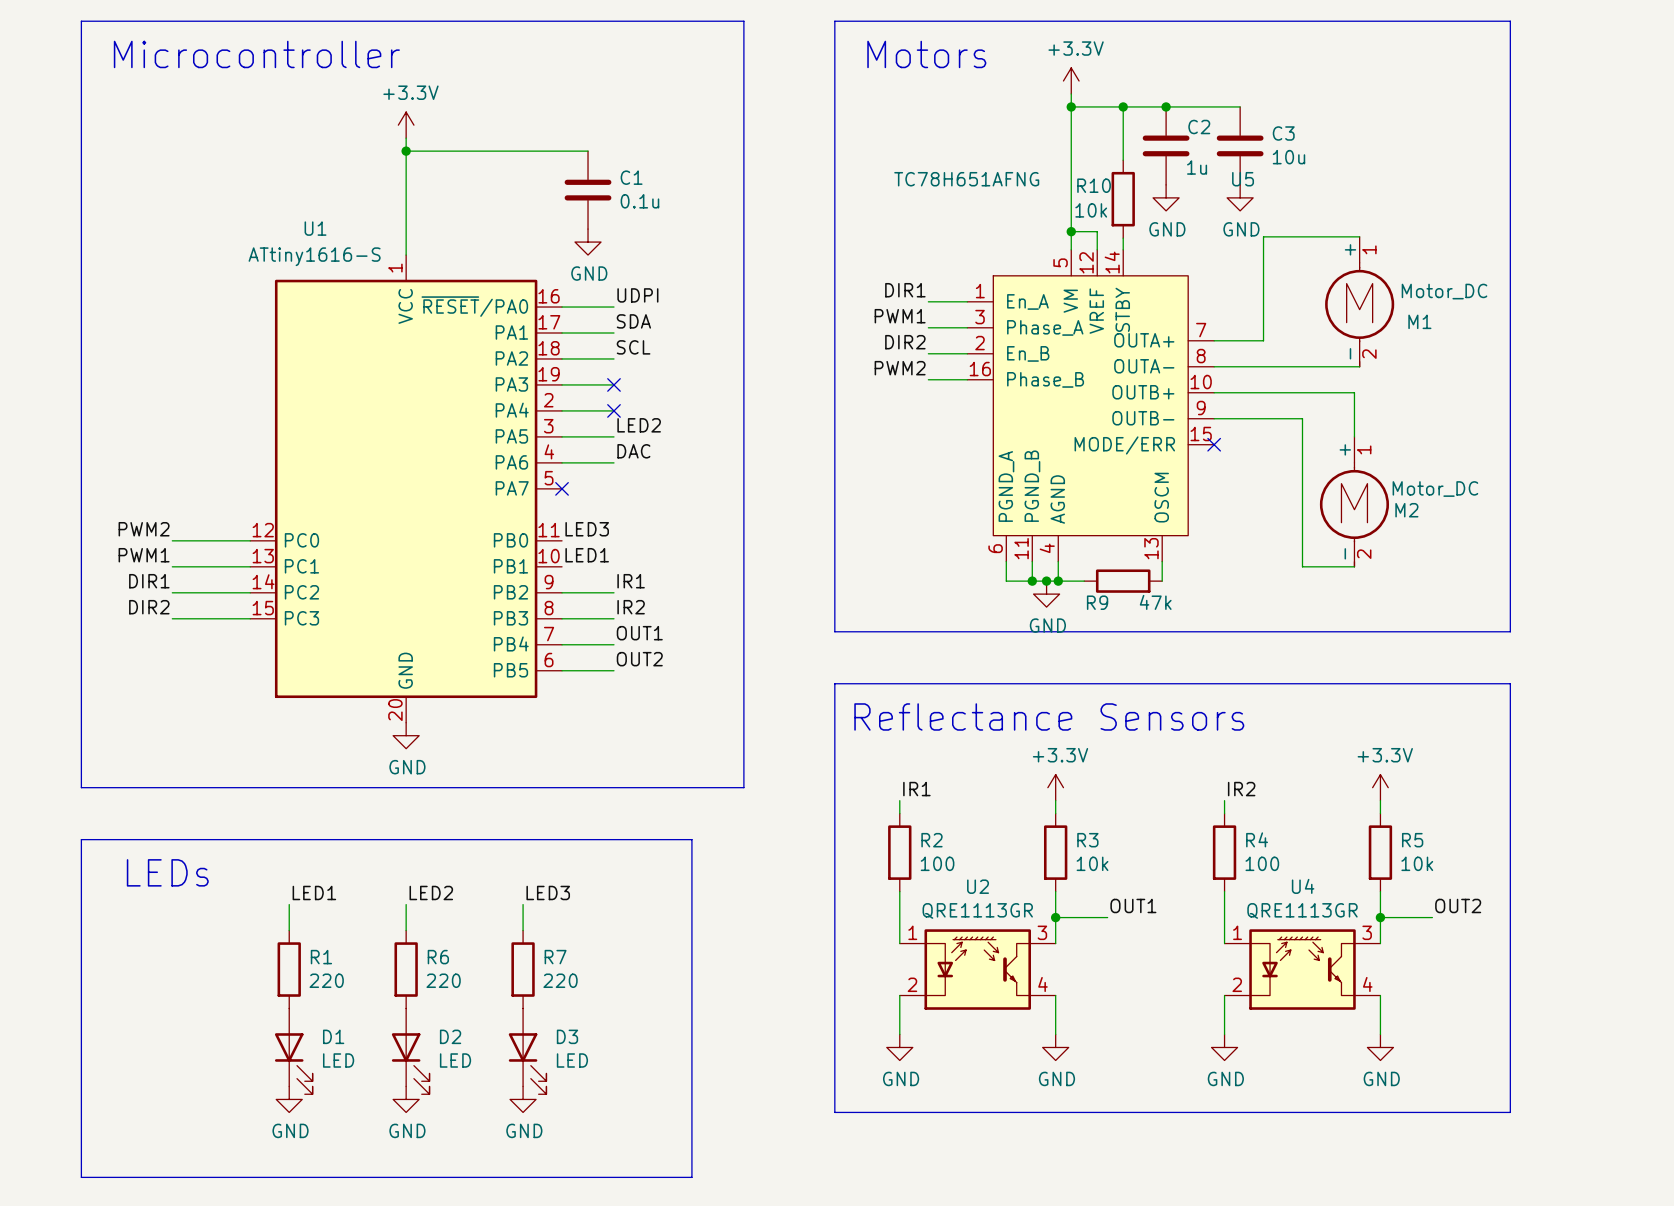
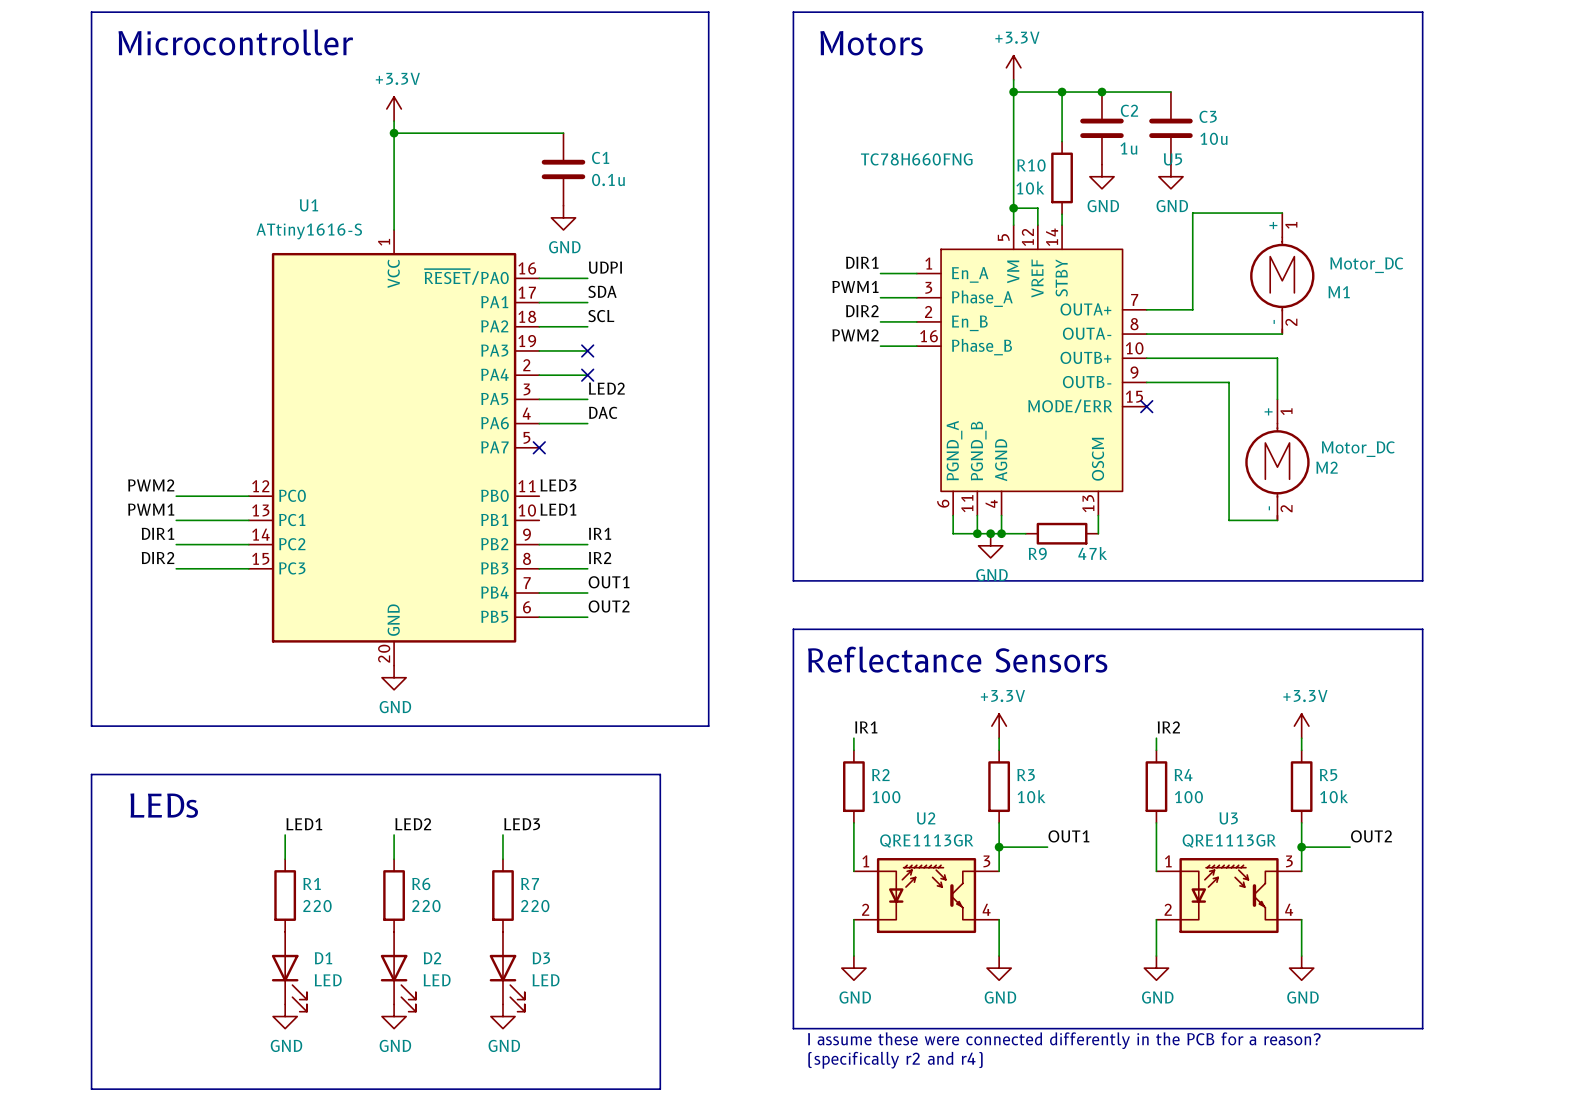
U5 value: TC78H651AFNG (966, 179) -> TC78H660FNG (916, 159)
U4 name: U4 (1303, 886) -> U3 (1228, 818)
text: none -> I assume these were connected differently in the PCB for a reason? (1064, 1040)
text: none -> (specifically r2 and r4) (895, 1060)

